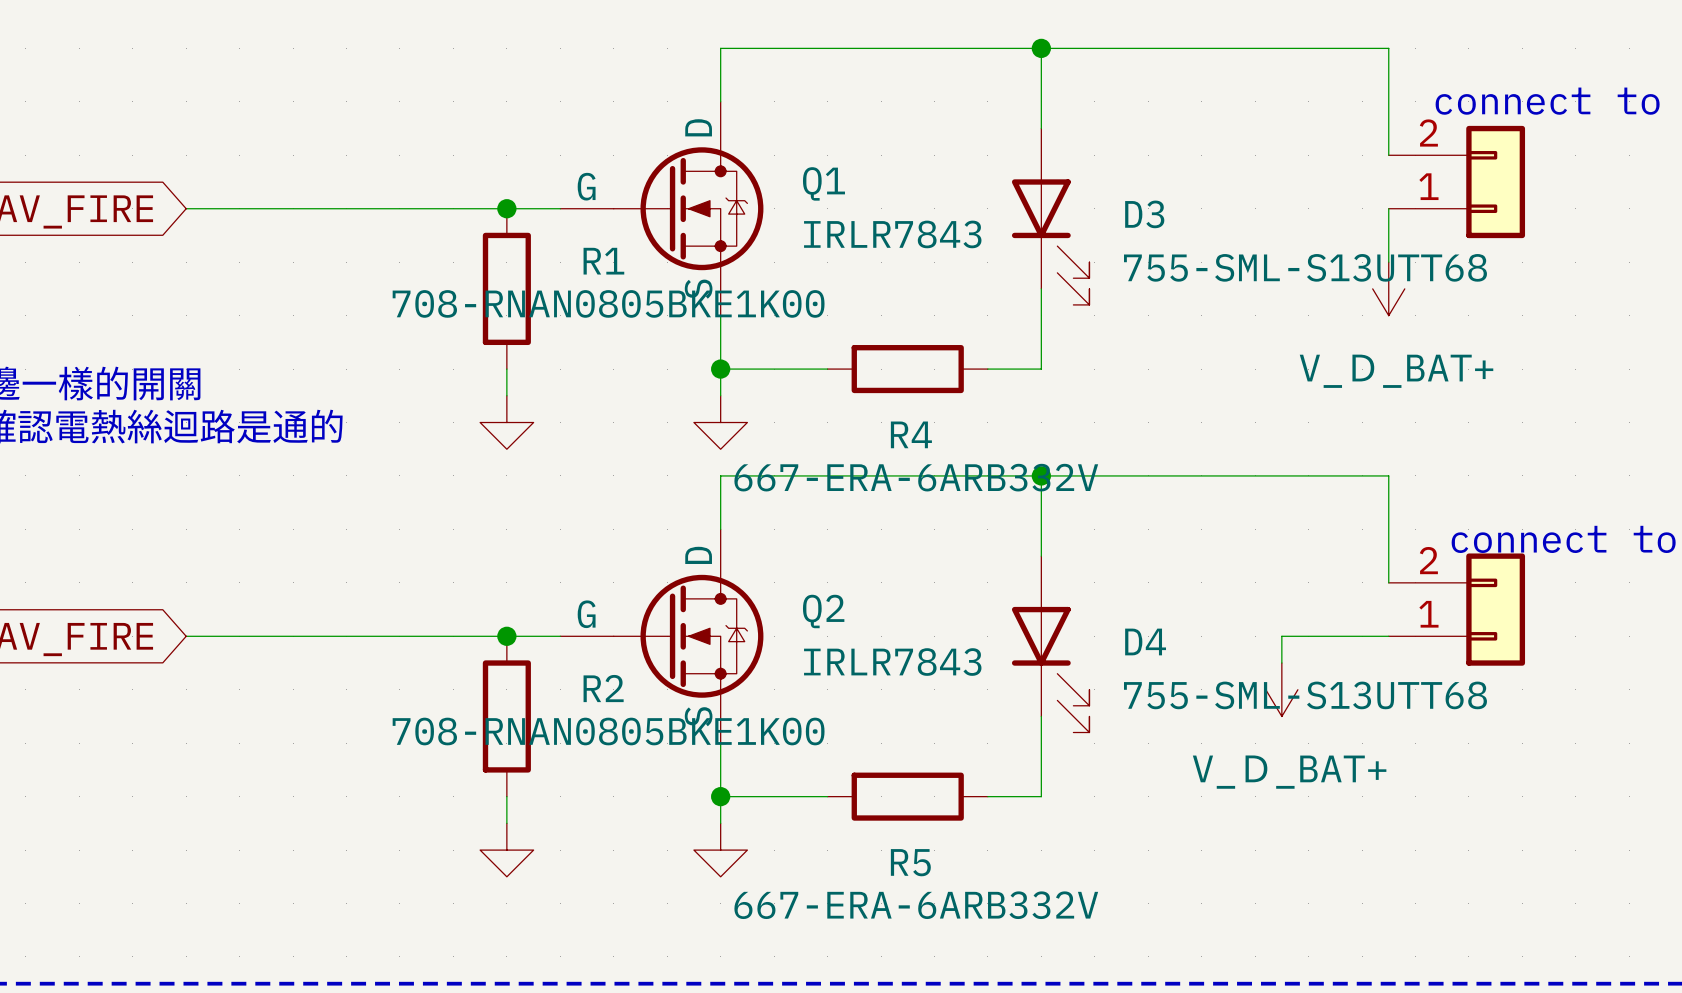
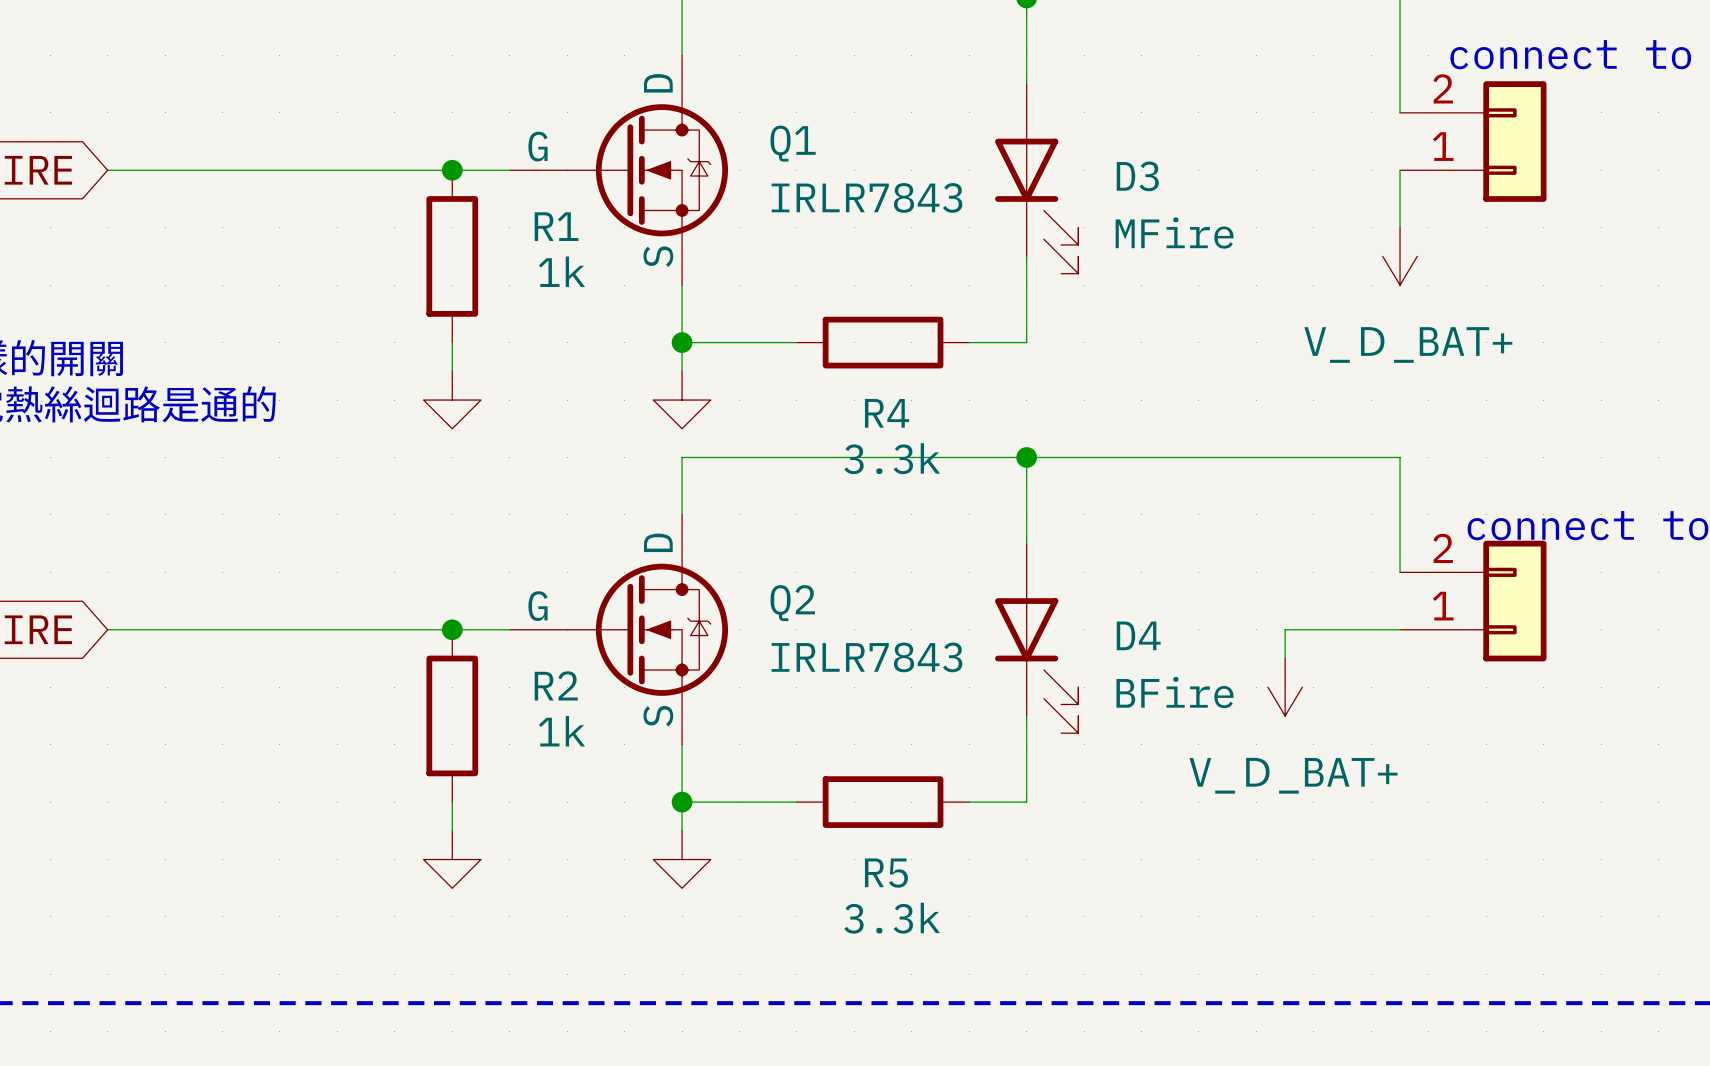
D3 value: 755-SML-S13UTT68 (1305, 267) -> MFire (1174, 233)
R1 value: 708-RNAN0805BKE1K00 (608, 303) -> 1k (561, 271)
R4 value: 667-ERA-6ARB332V (916, 477) -> 3.3k (892, 458)
D4 value: 755-SML-S13UTT68 (1305, 695) -> BFire (1174, 692)
R2 value: 708-RNAN0805BKE1K00 (608, 731) -> 1k (561, 731)
R5 value: 667-ERA-6ARB332V (916, 905) -> 3.3k (892, 918)

